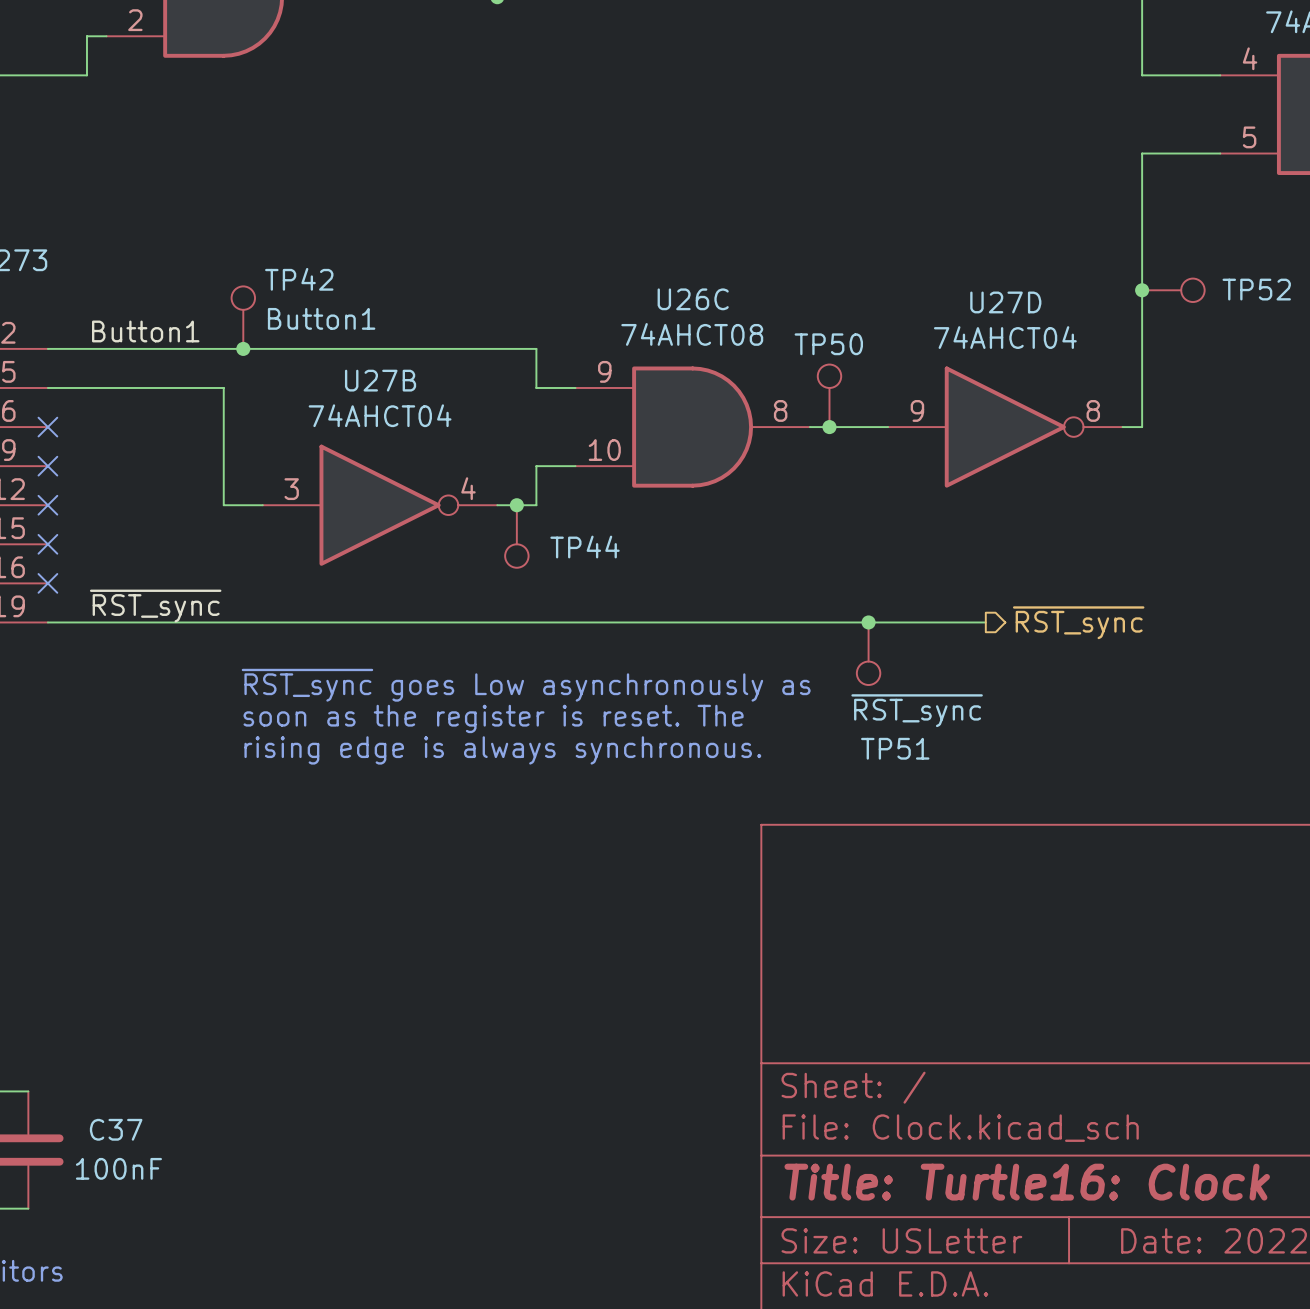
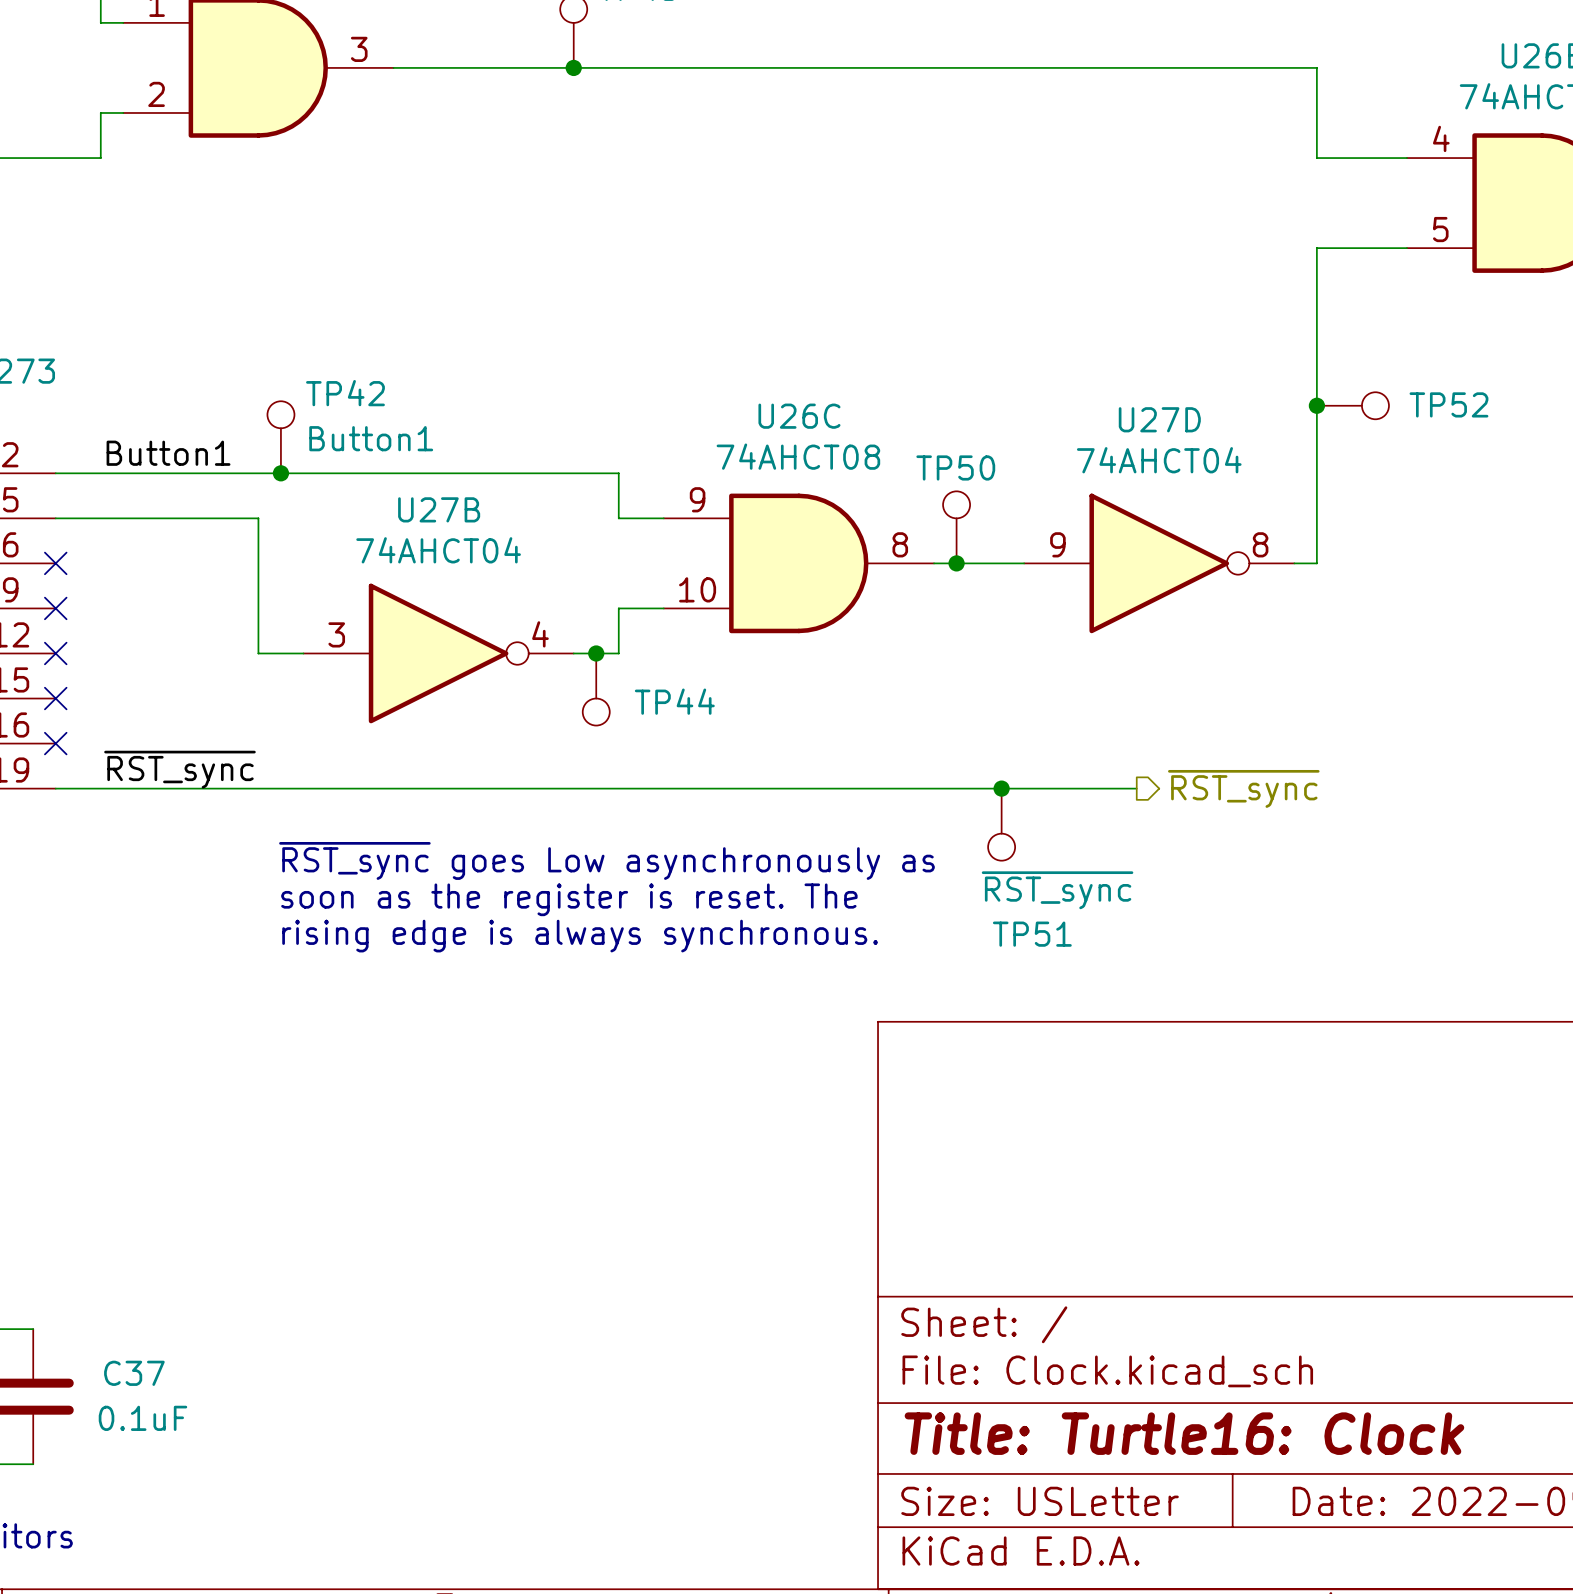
C37 value: 100nF (118, 1168) -> 0.1uF (142, 1418)

